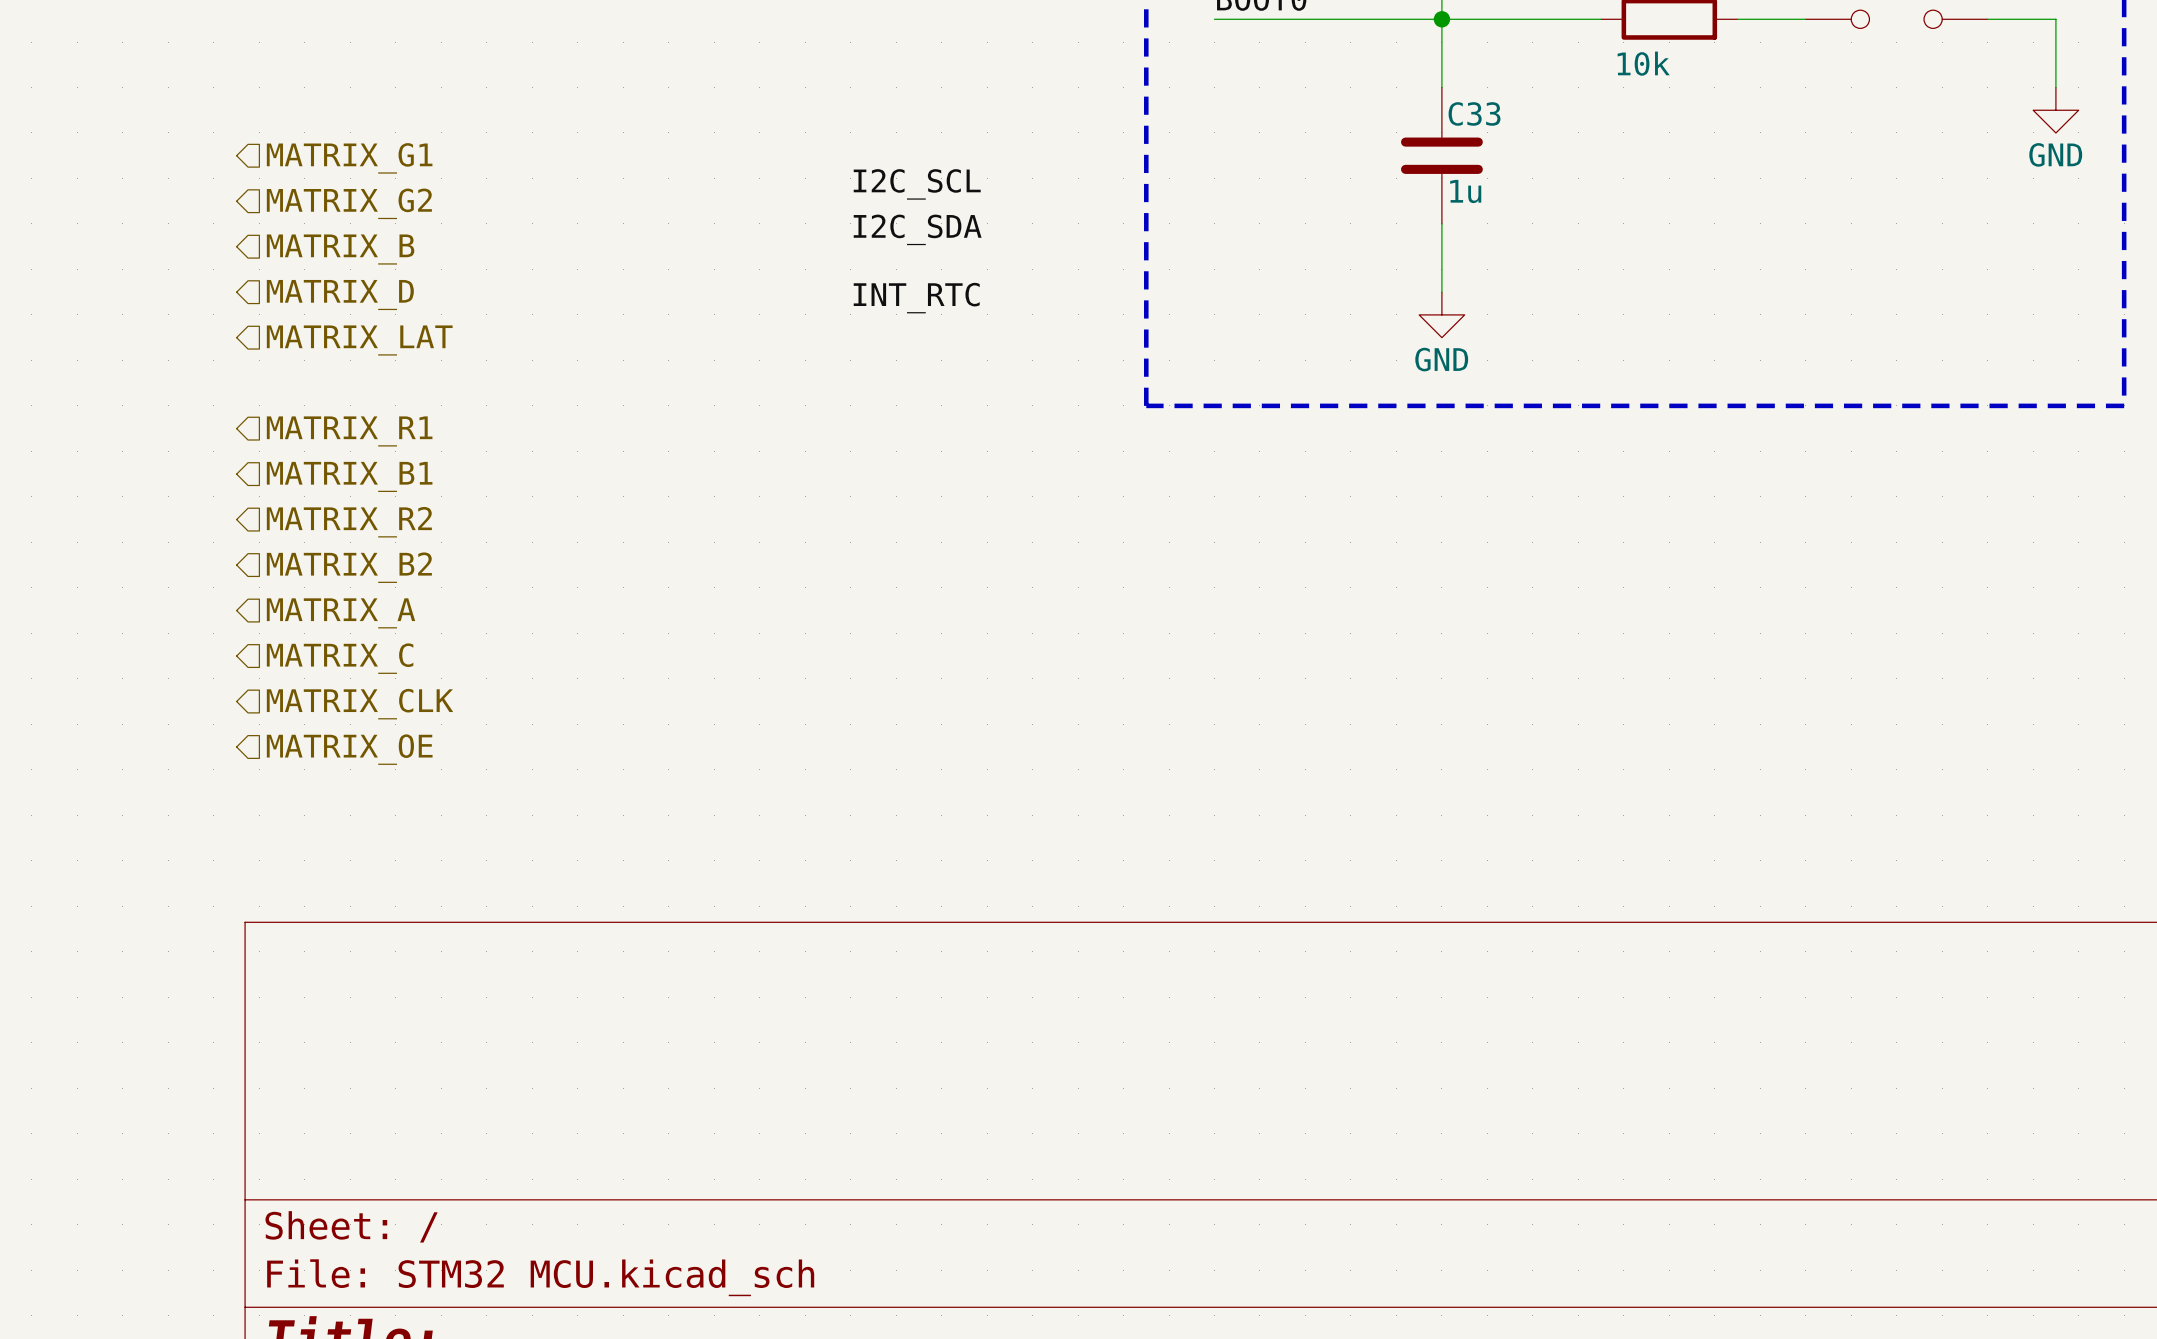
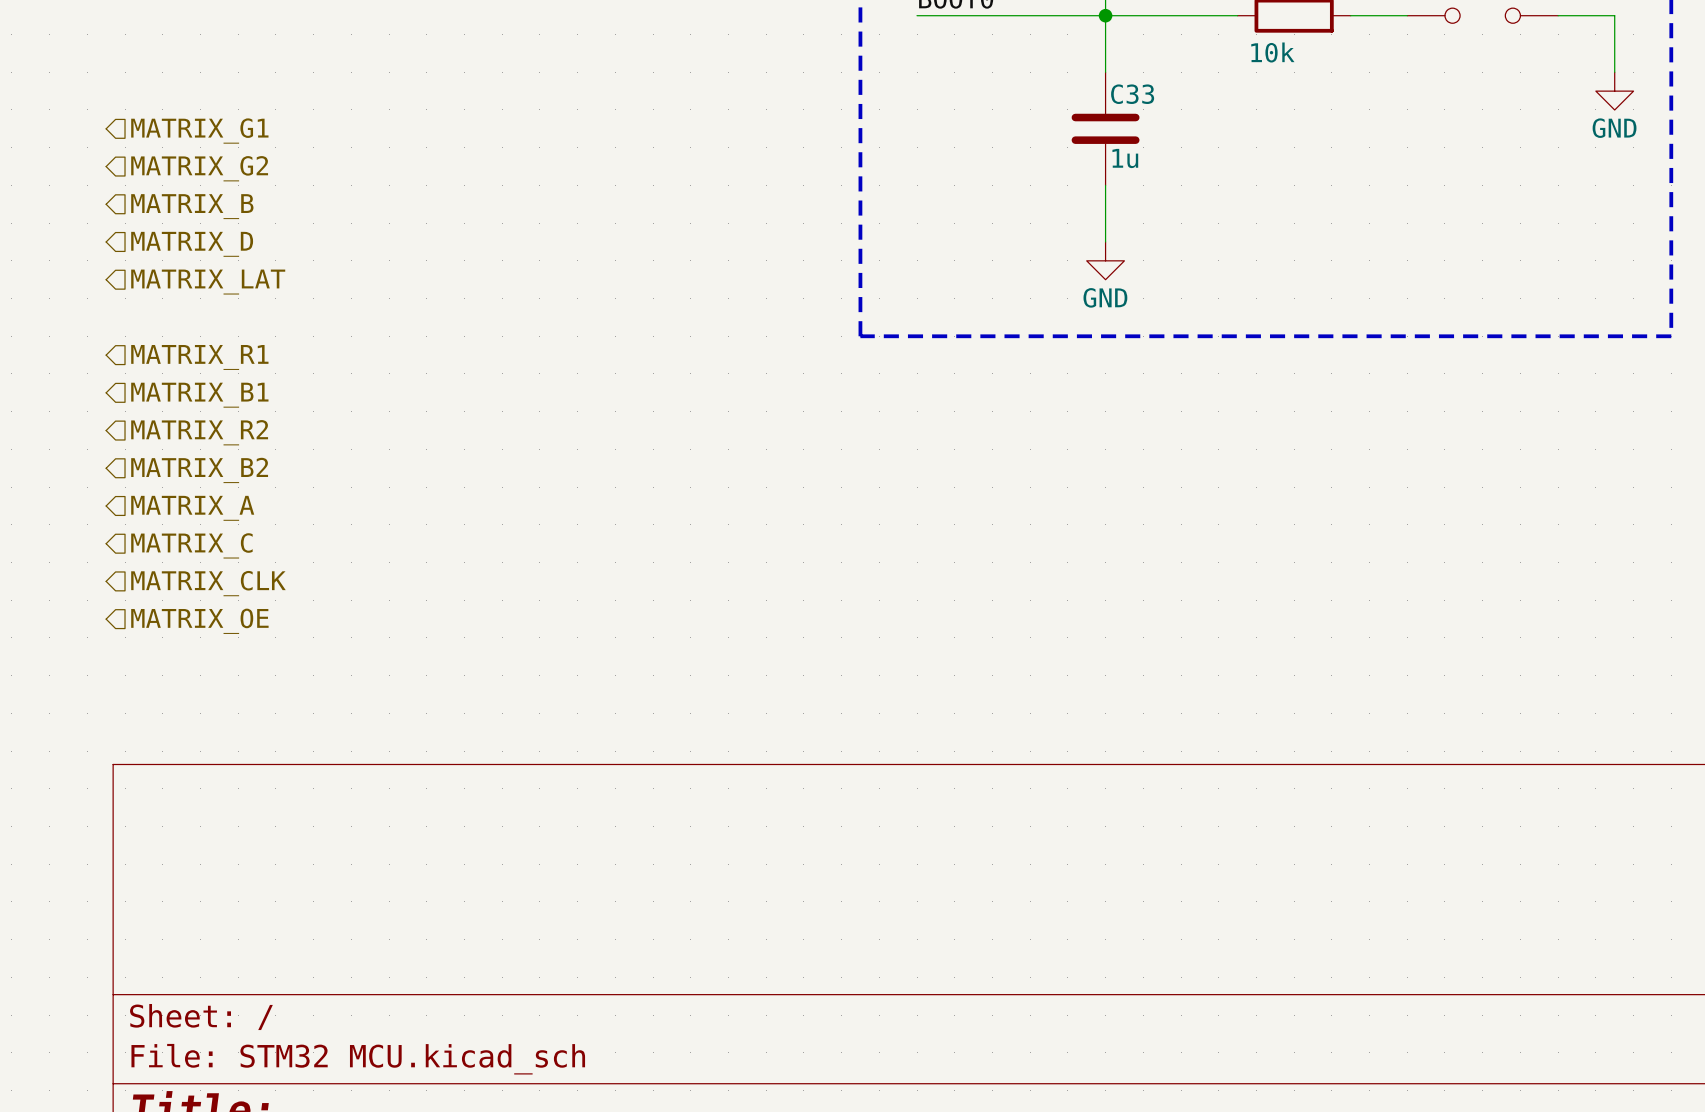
label: I2C_SCL (917, 184) -> none
label: I2C_SDA (917, 229) -> none
label: INT_RTC (916, 298) -> none

